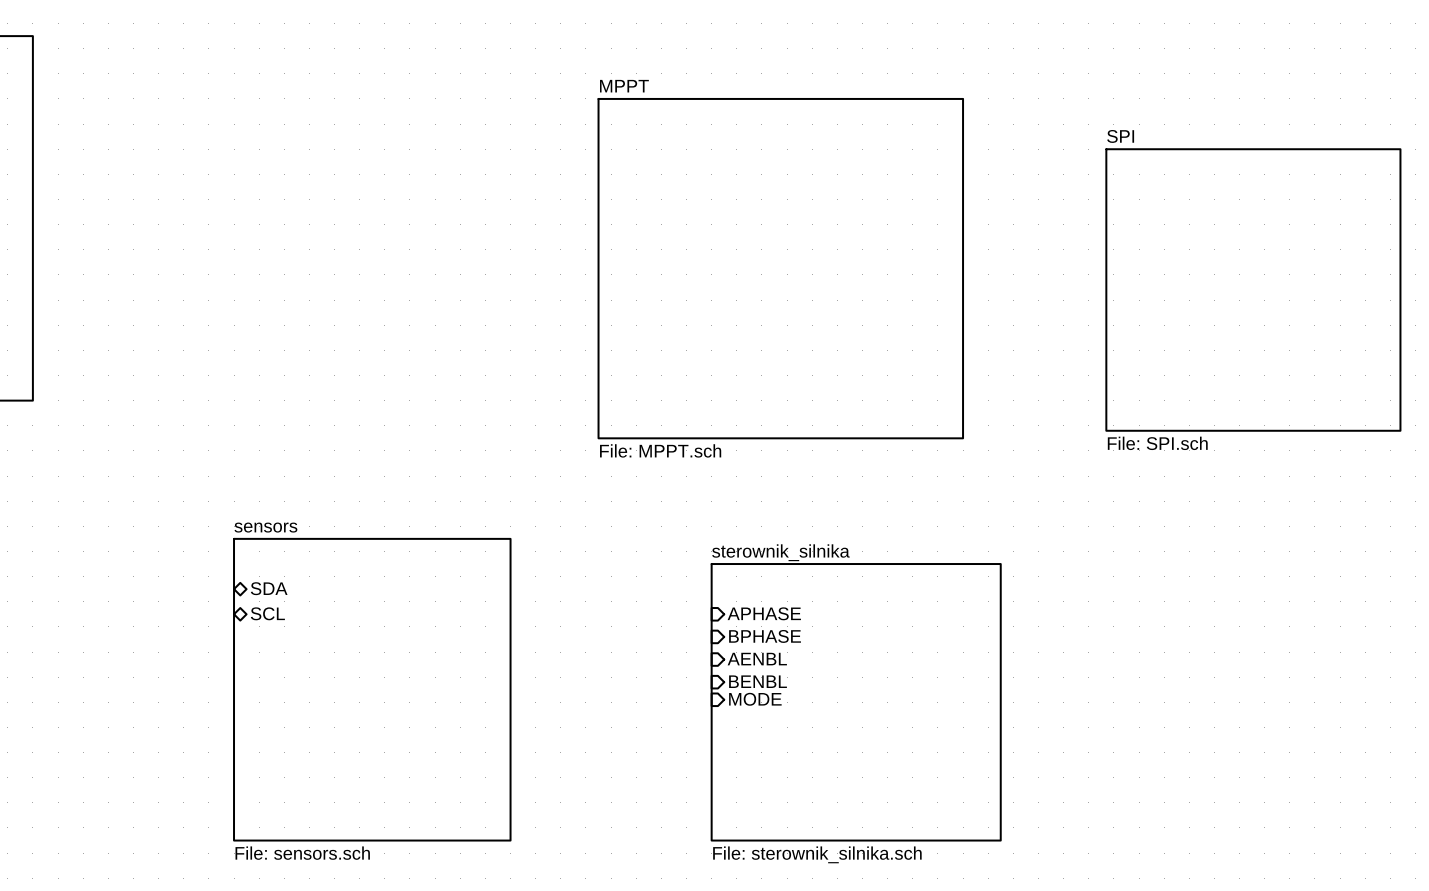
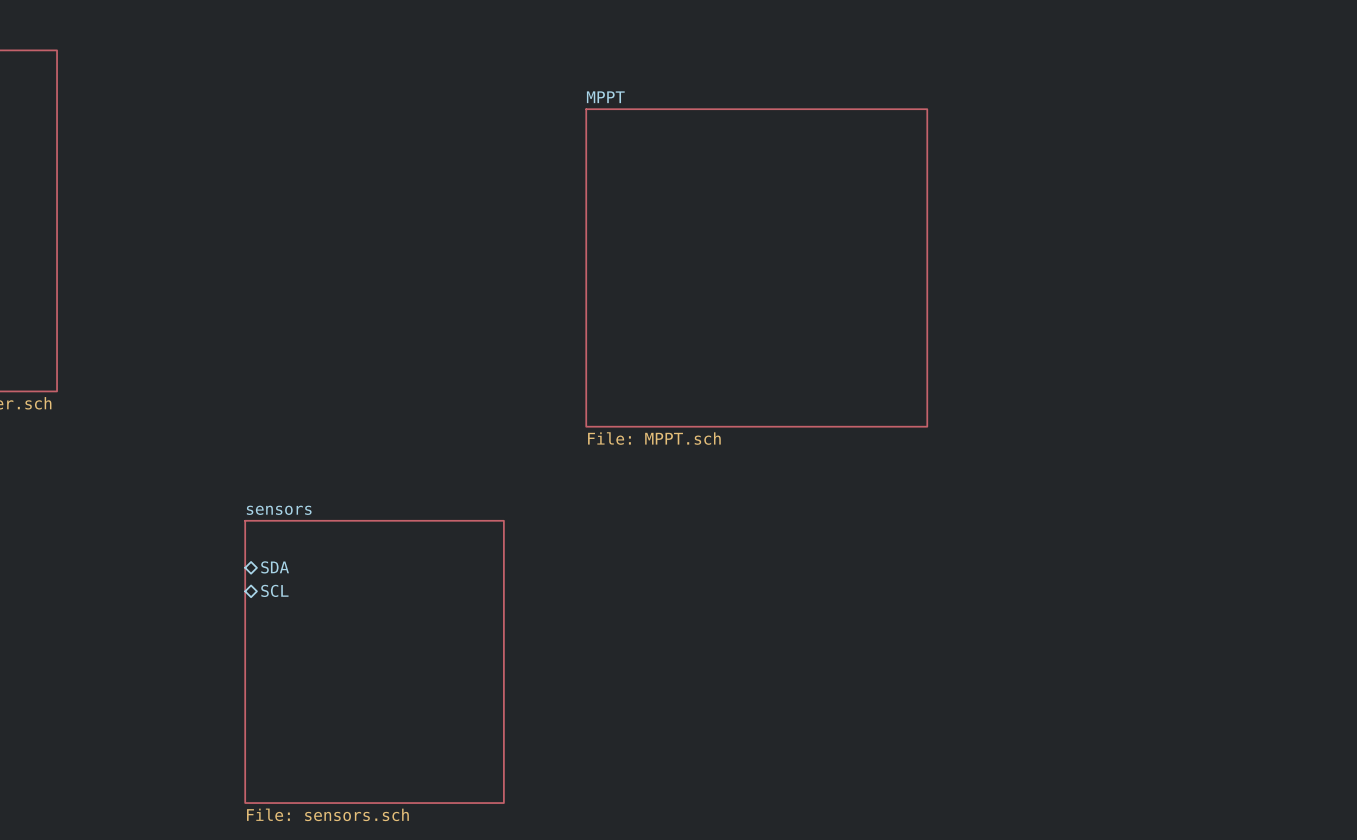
sheet SPI: File: SPI.sch (1253, 290) -> none
sheet pin: APHASE (764, 613) -> none
sheet pin: BPHASE (765, 636) -> none
sheet pin: AENBL (757, 659) -> none
sheet pin: BENBL (758, 681) -> none
sheet pin: MODE (755, 699) -> none
sheet sterownik_silnika: File: sterownik_silnika.sch (856, 702) -> none

